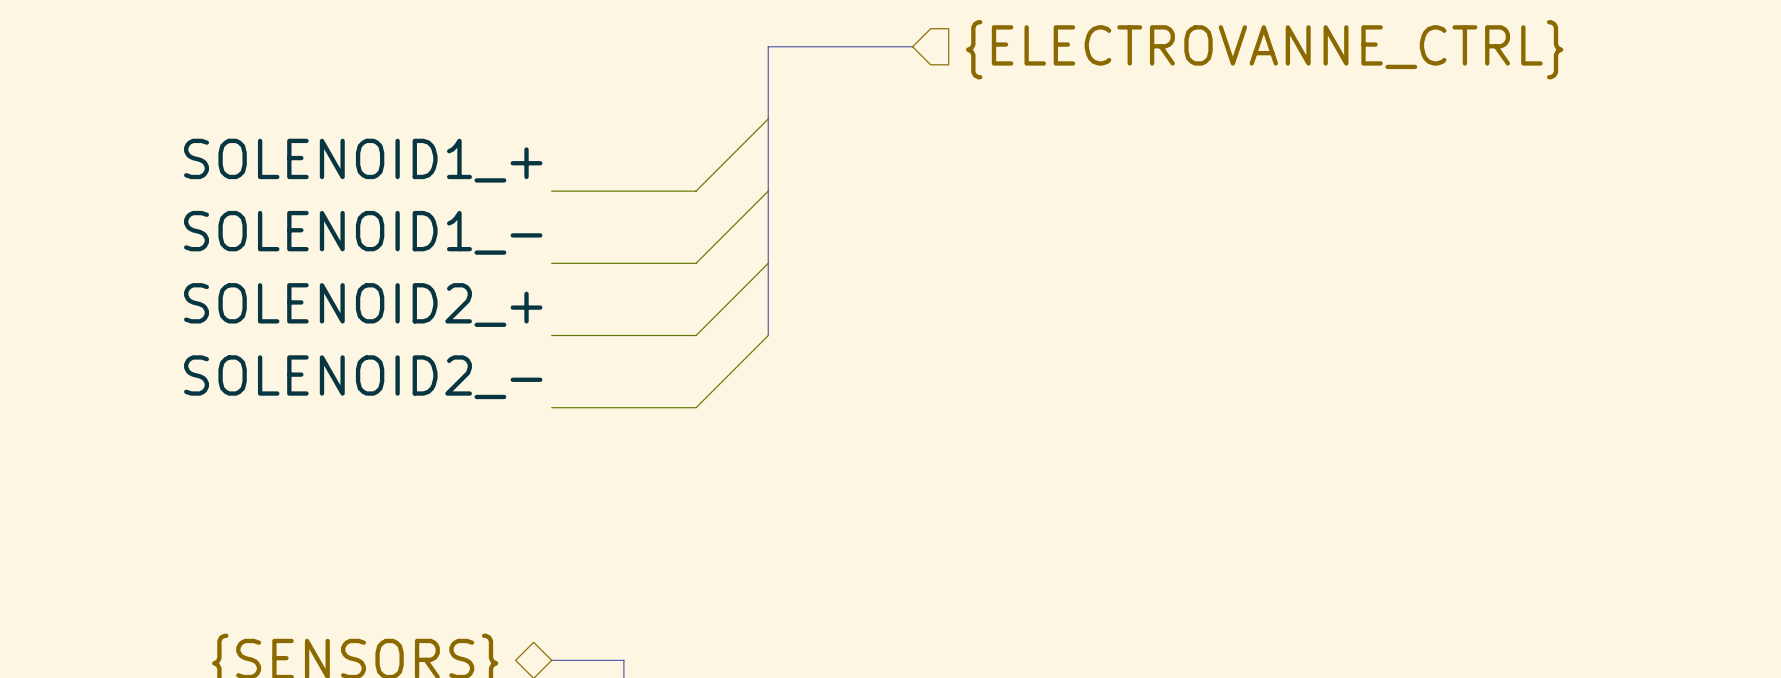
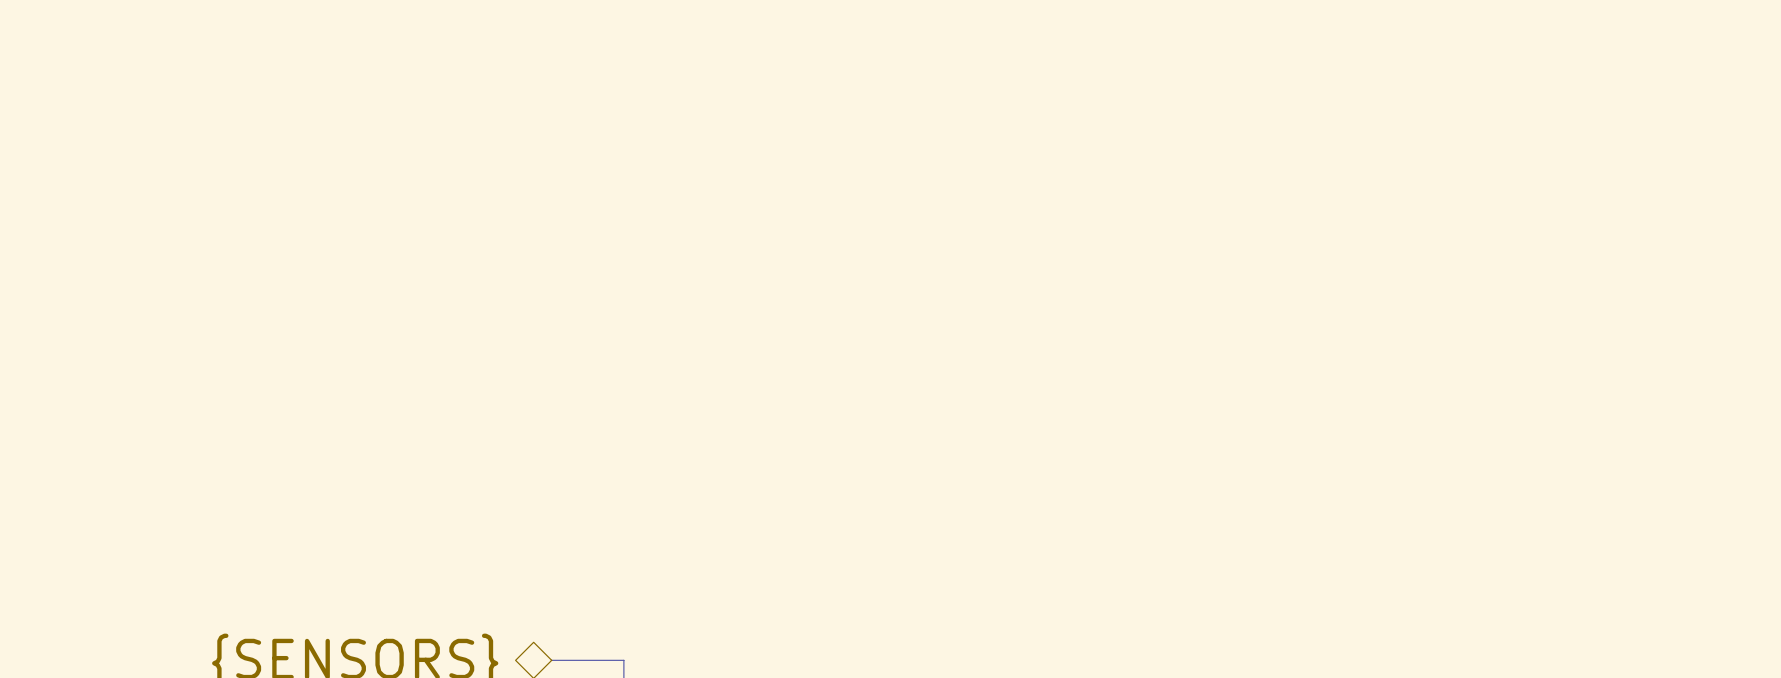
bus: (912, 46) (768, 46) (768, 335) -> none
hierarchical label: {ELECTROVANNE_CTRL} (1264, 49) -> none
wire: (768, 118) (696, 191) (551, 191) -> none
label: SOLENOID1_+ (363, 160) -> none
wire: (768, 191) (696, 263) (551, 263) -> none
label: SOLENOID1_- (363, 232) -> none
wire: (768, 263) (696, 335) (551, 335) -> none
label: SOLENOID2_+ (363, 305) -> none
wire: (768, 335) (696, 407) (551, 407) -> none
label: SOLENOID2_- (363, 377) -> none

